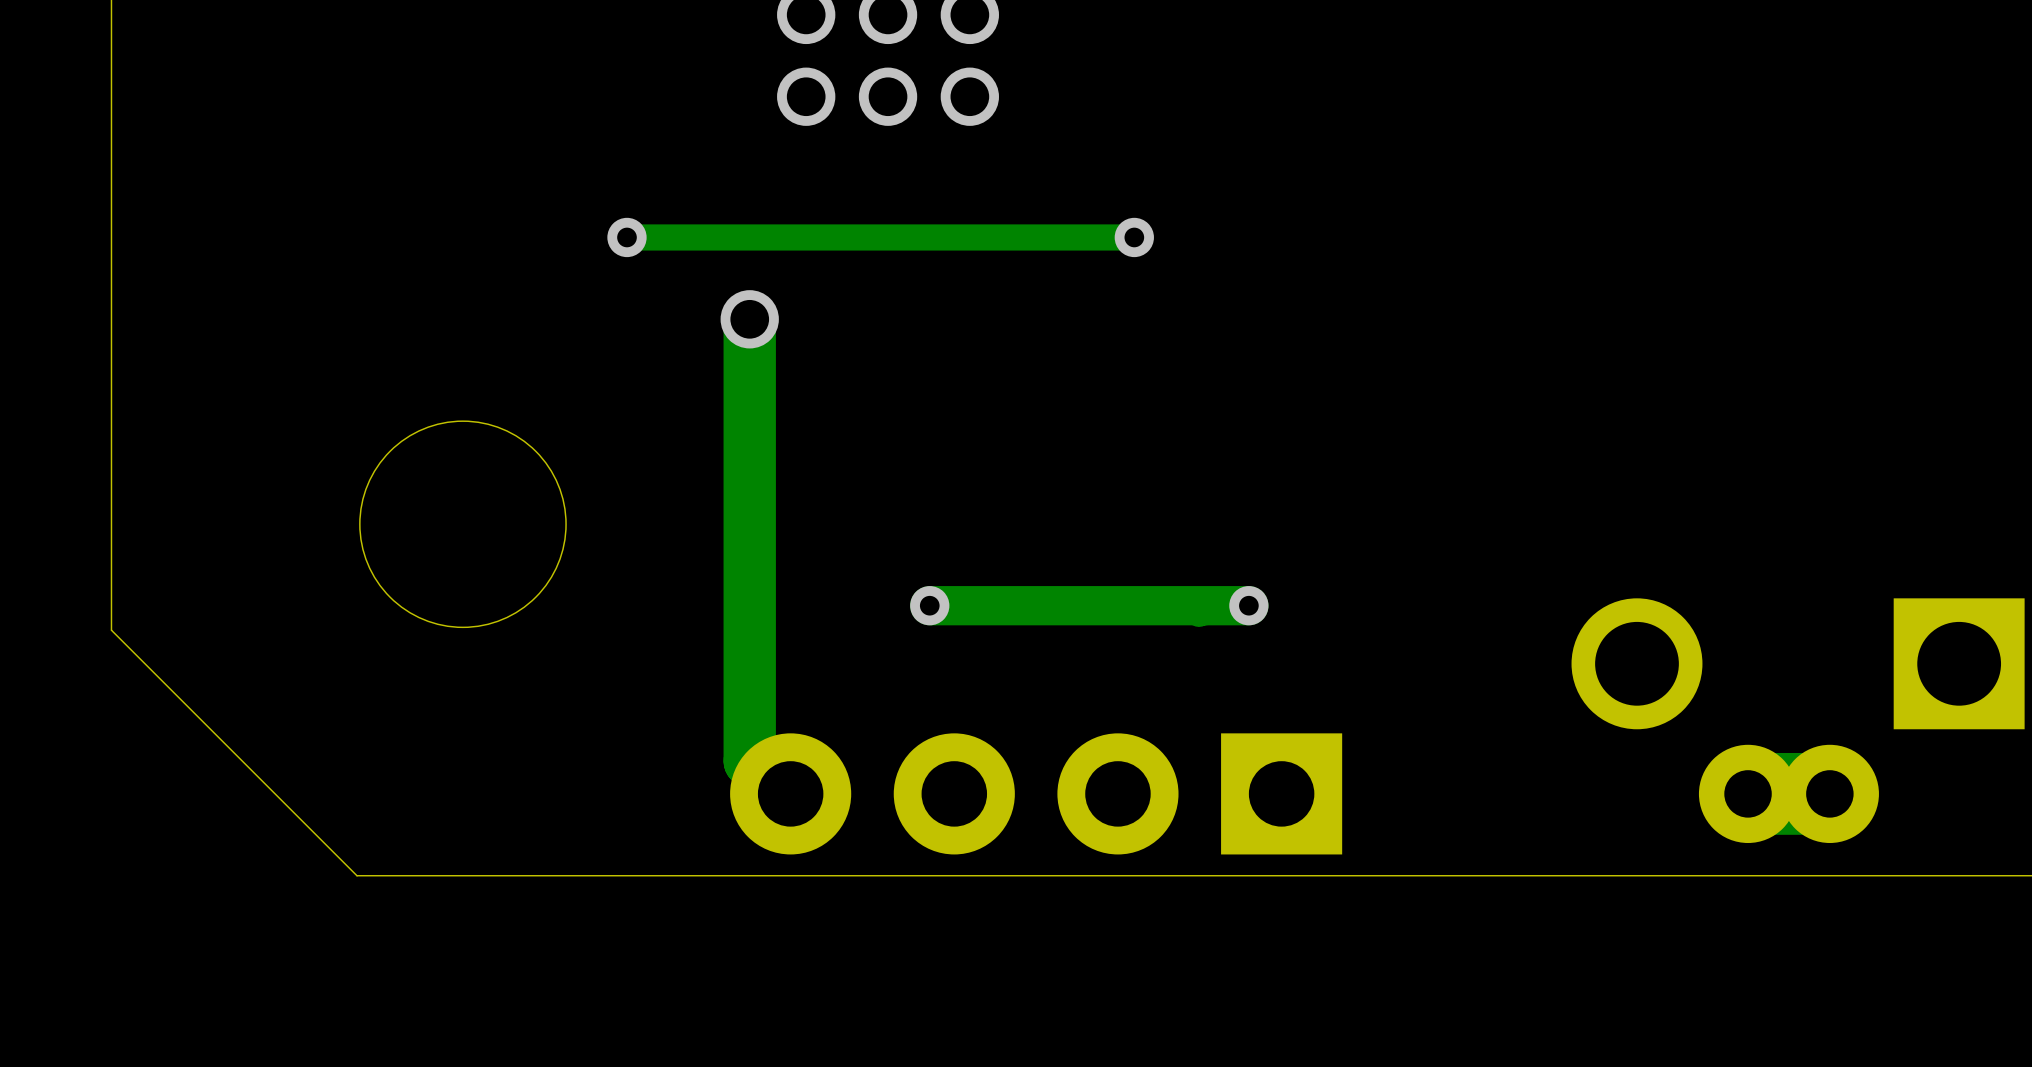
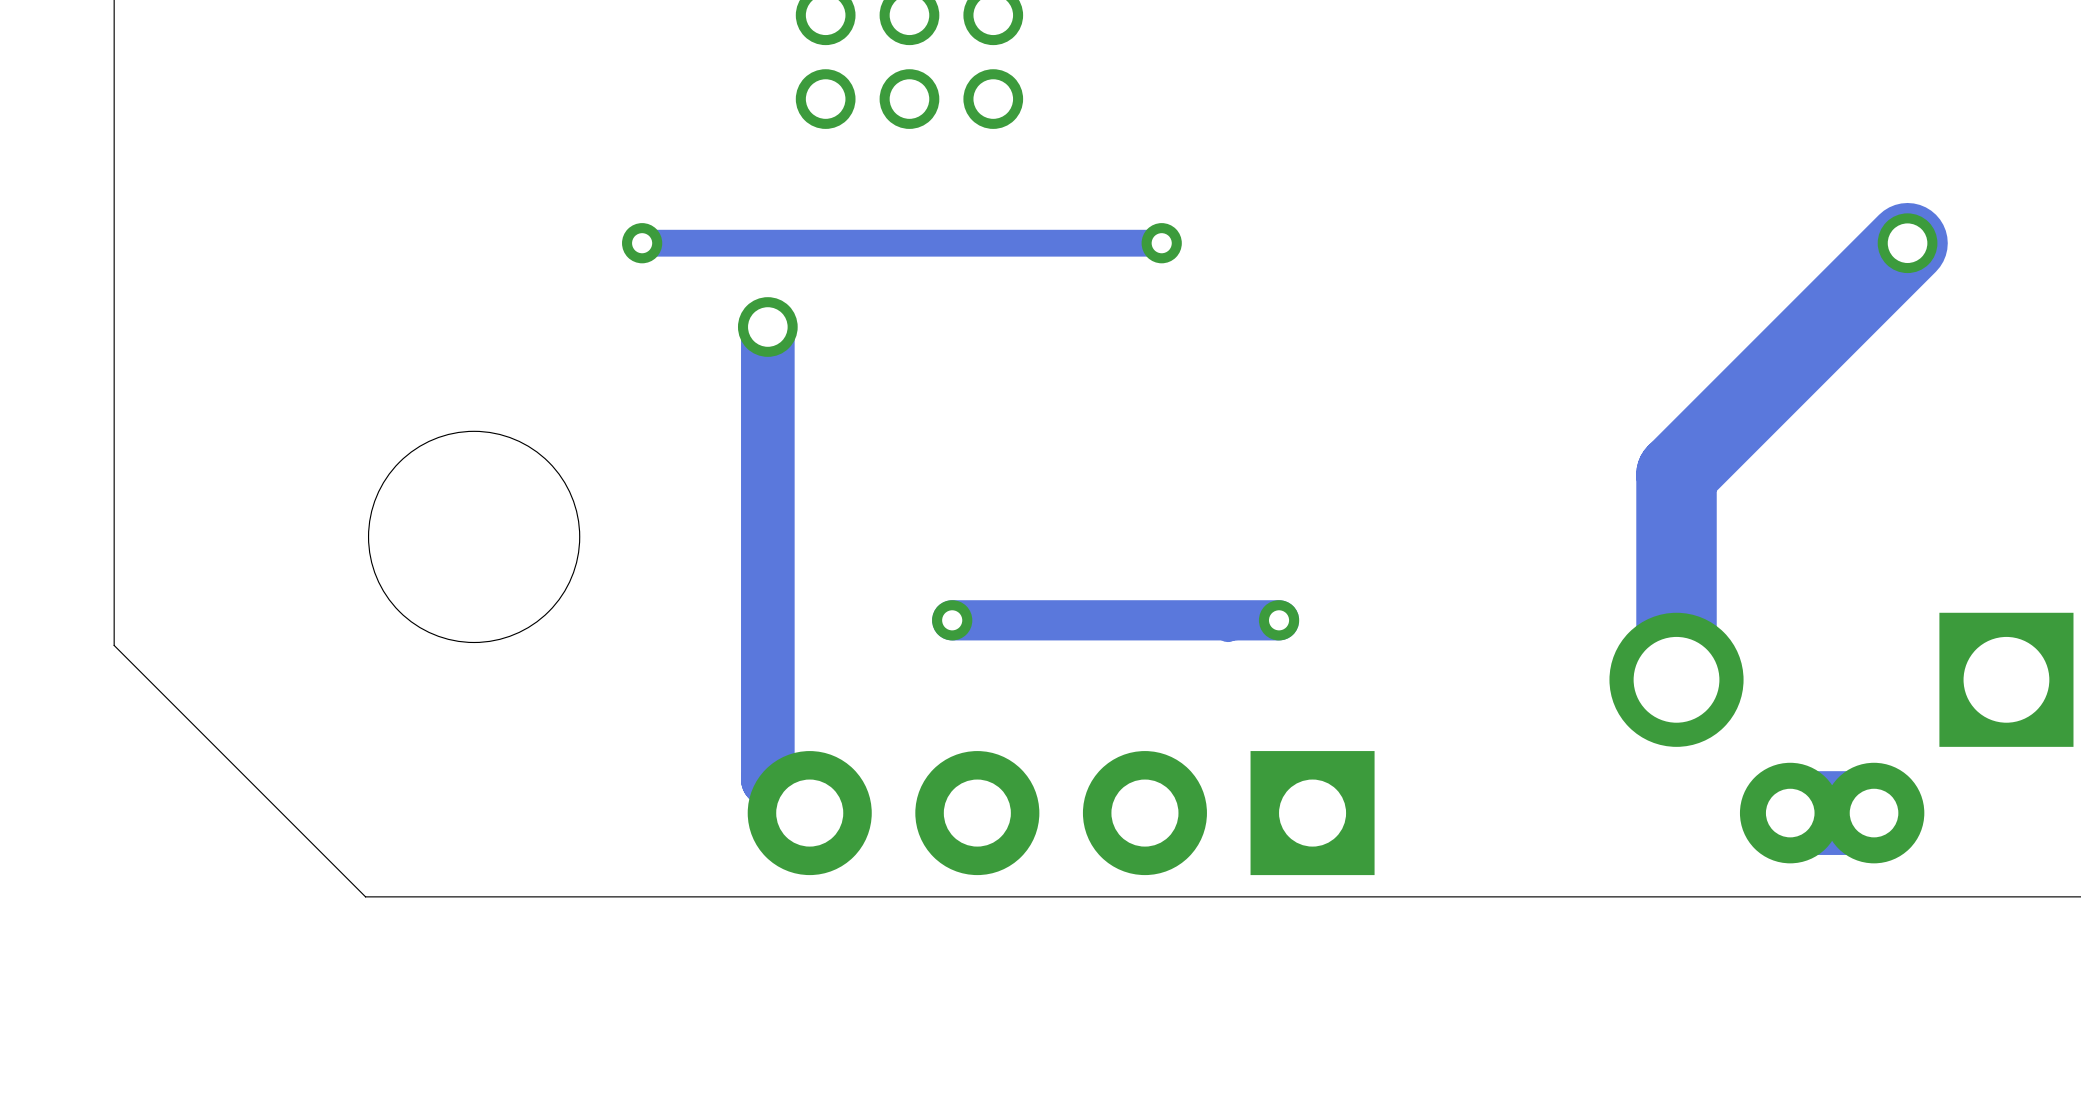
track: none -> (1907, 243) (1676, 474) (1676, 679)
via: none -> (1907, 243)

